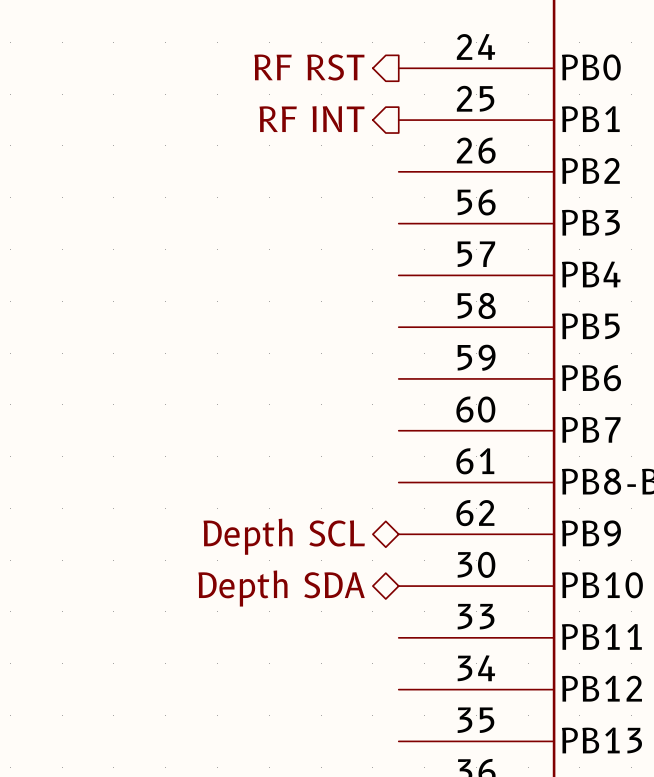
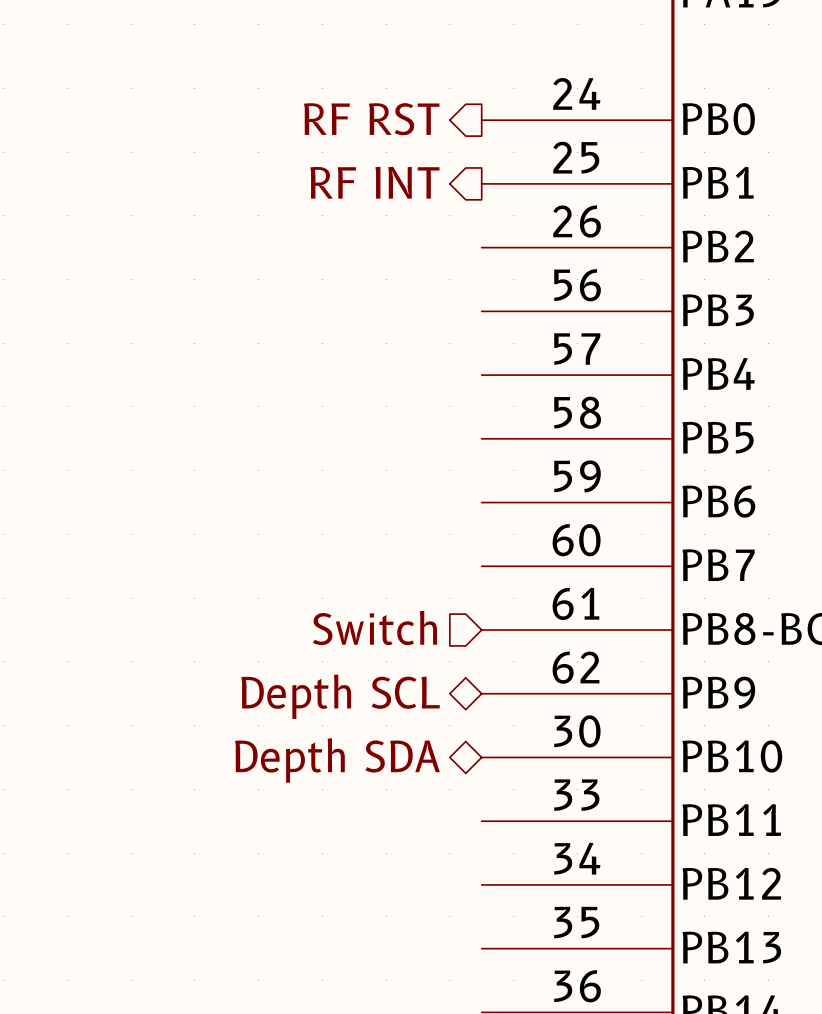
hierarchical label: none -> Switch (375, 627)

